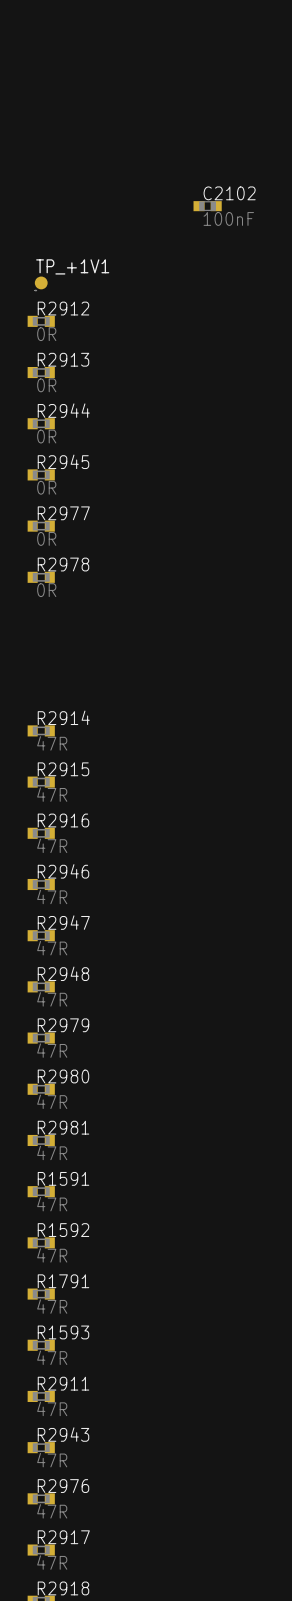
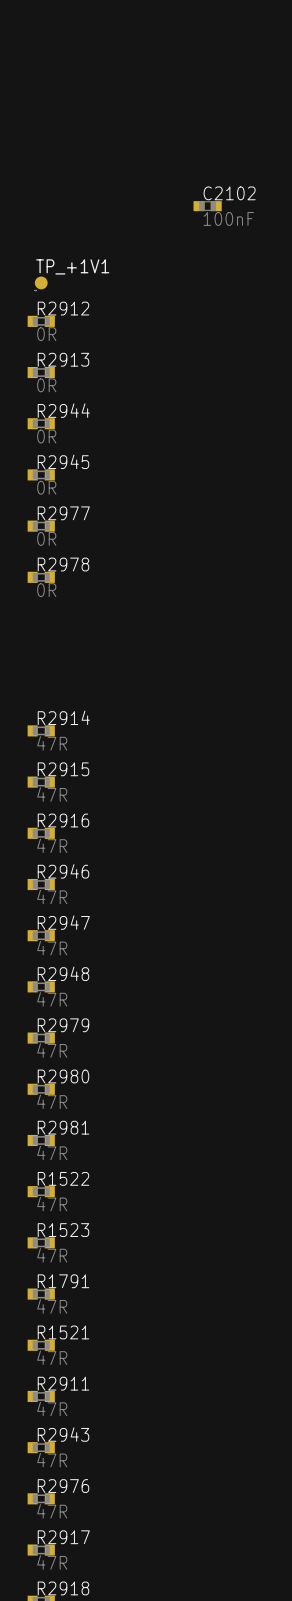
R1591 name: R1591 (63, 1178) -> R1522 (63, 1178)
R1592 name: R1592 (63, 1230) -> R1523 (63, 1230)
R1593 name: R1593 (63, 1332) -> R1521 (63, 1332)

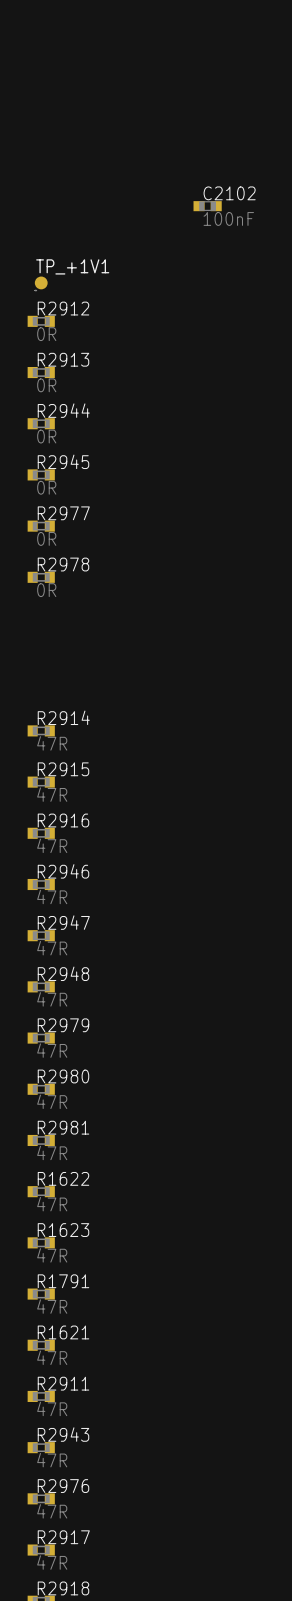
R1522 name: R1522 (63, 1178) -> R1622 (63, 1178)
R1523 name: R1523 (63, 1230) -> R1623 (63, 1230)
R1521 name: R1521 (63, 1332) -> R1621 (63, 1332)

